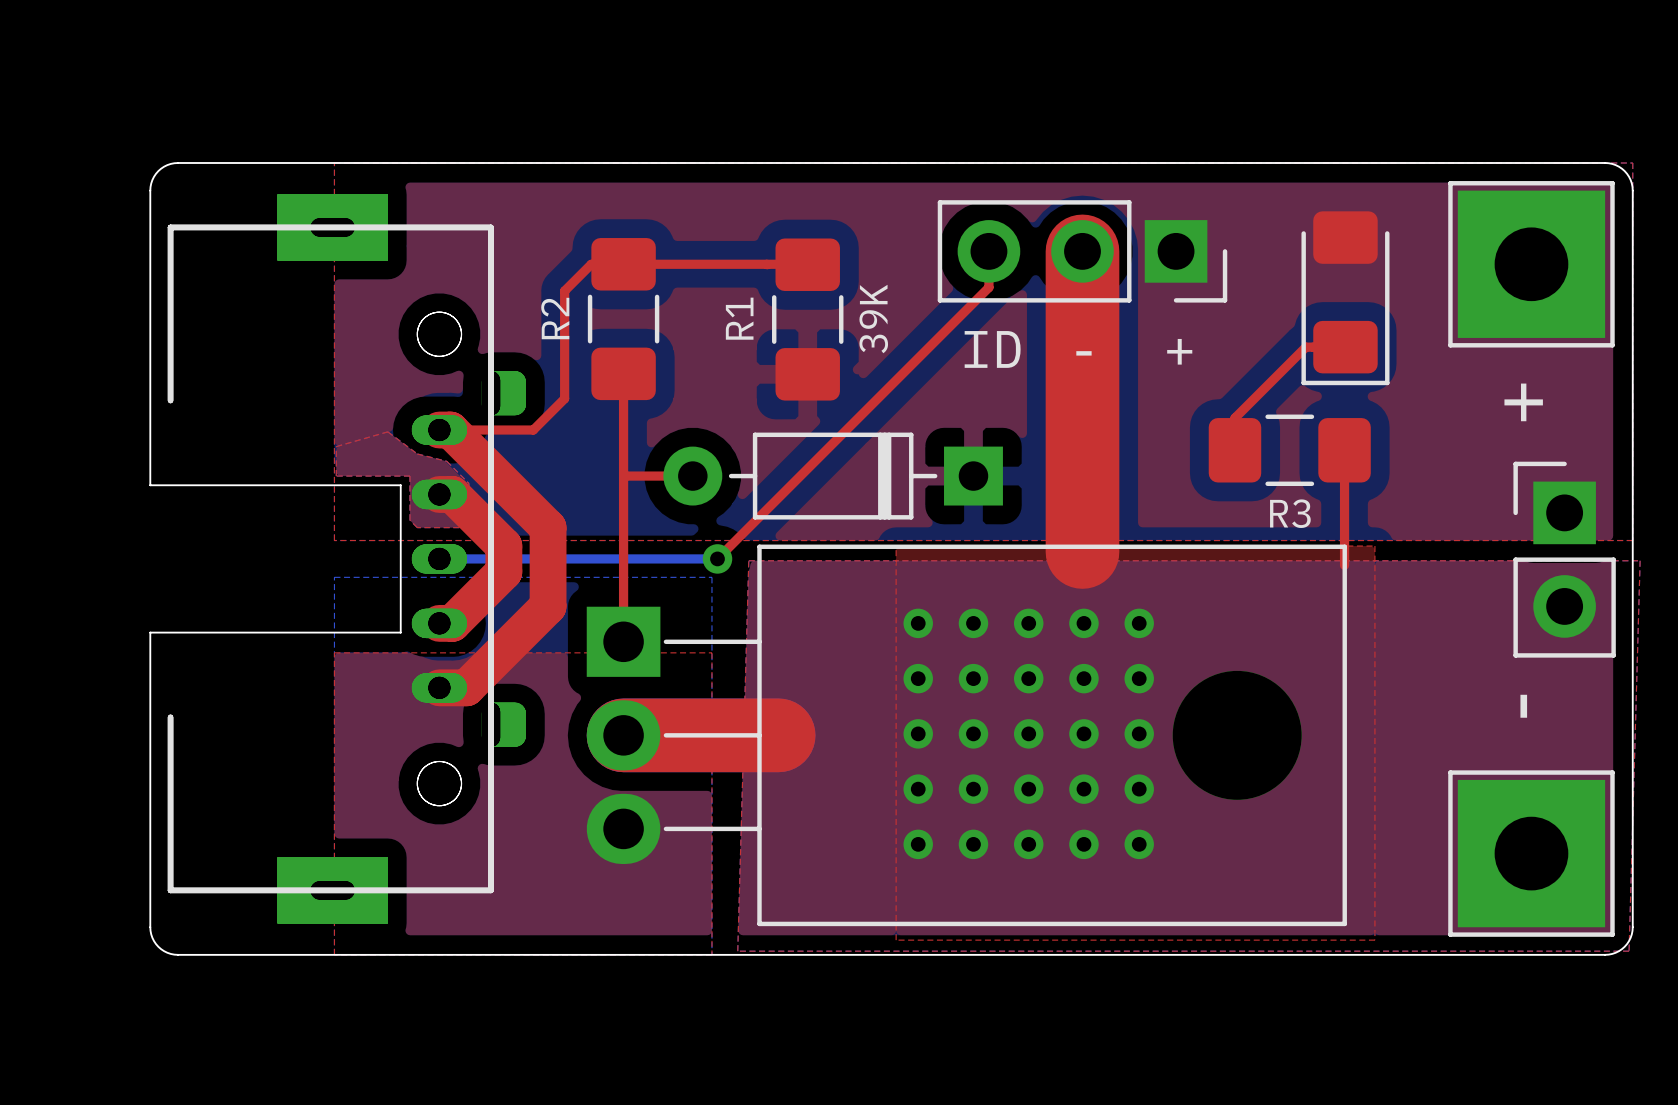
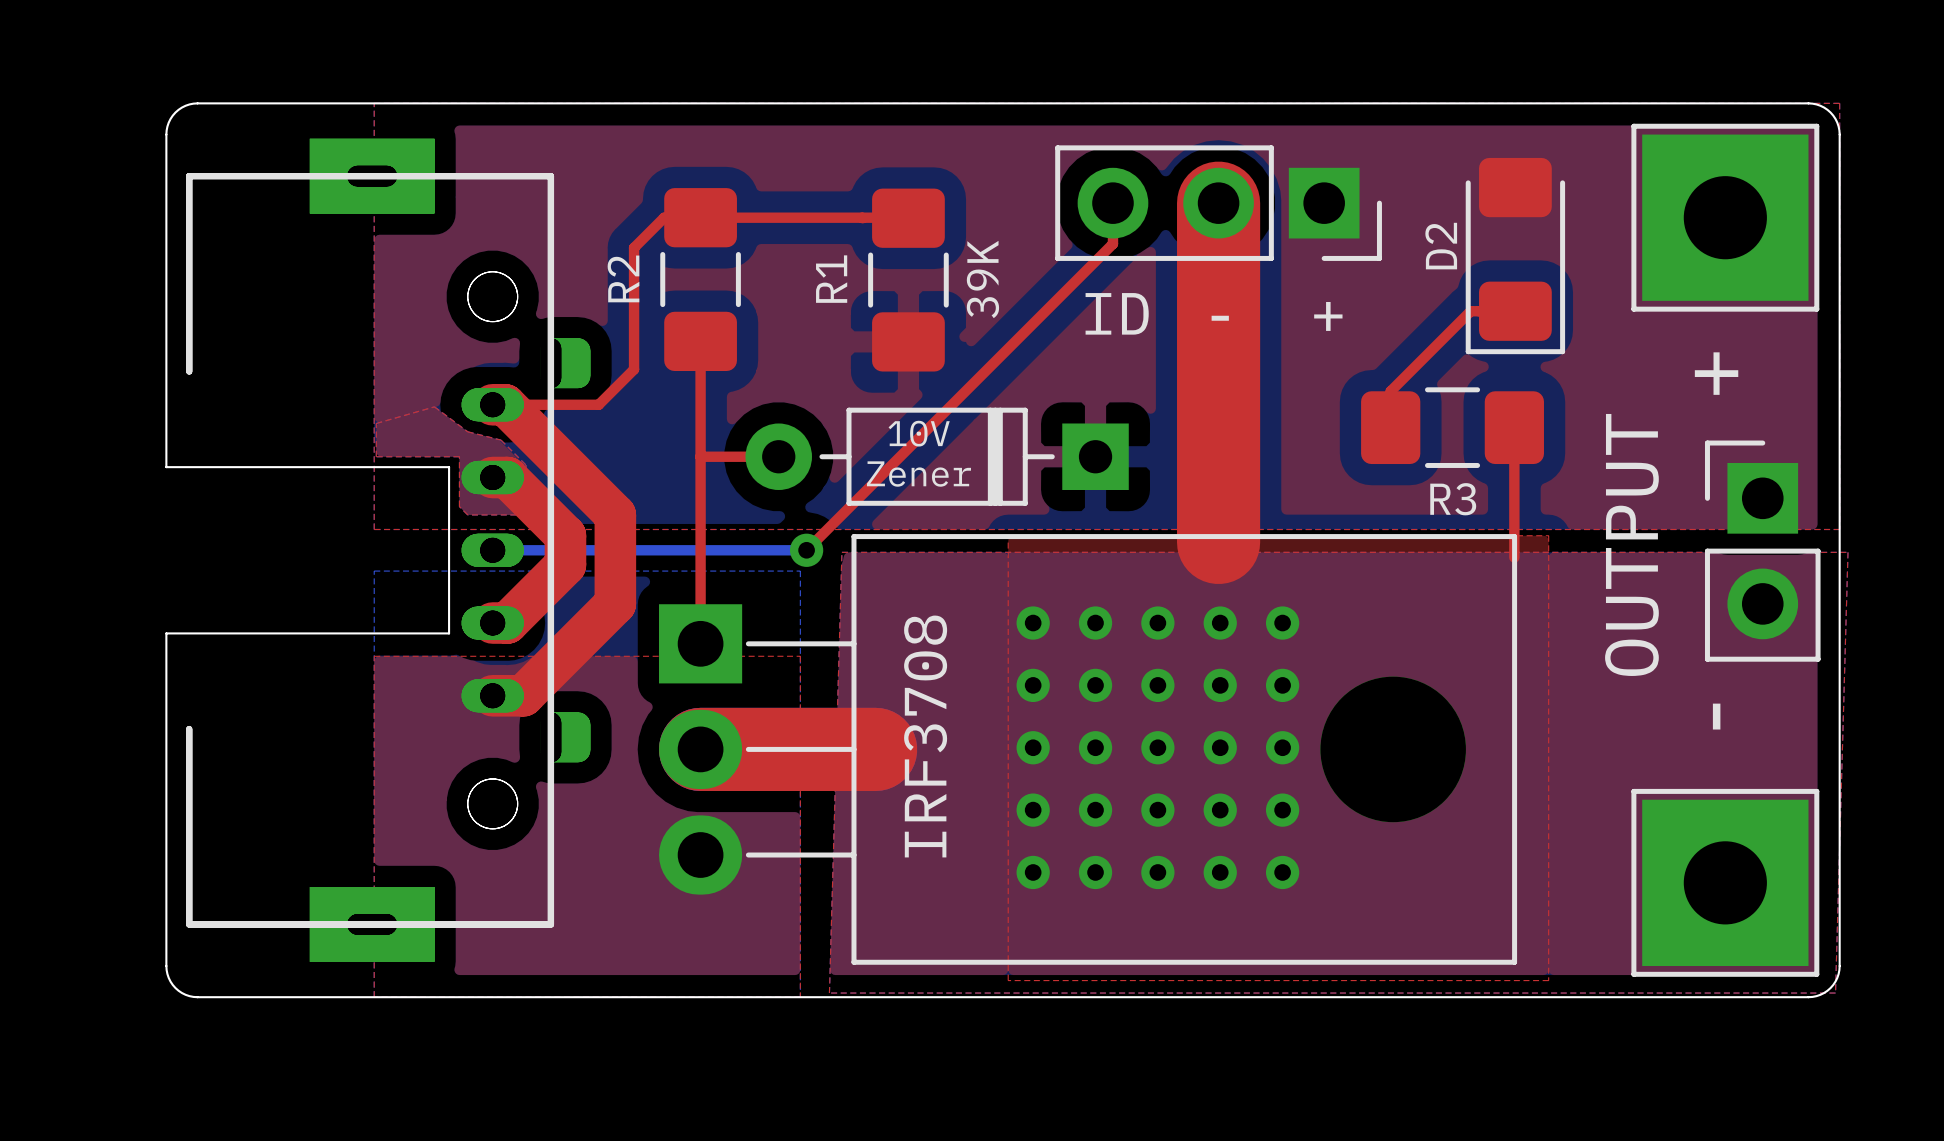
D2 name: none -> D2 (1441, 246)
text: none -> 10V (919, 433)
text: none -> Zener (918, 474)
text: none -> OUTPUT (1631, 544)
part value: none -> IRF3708 (925, 736)

